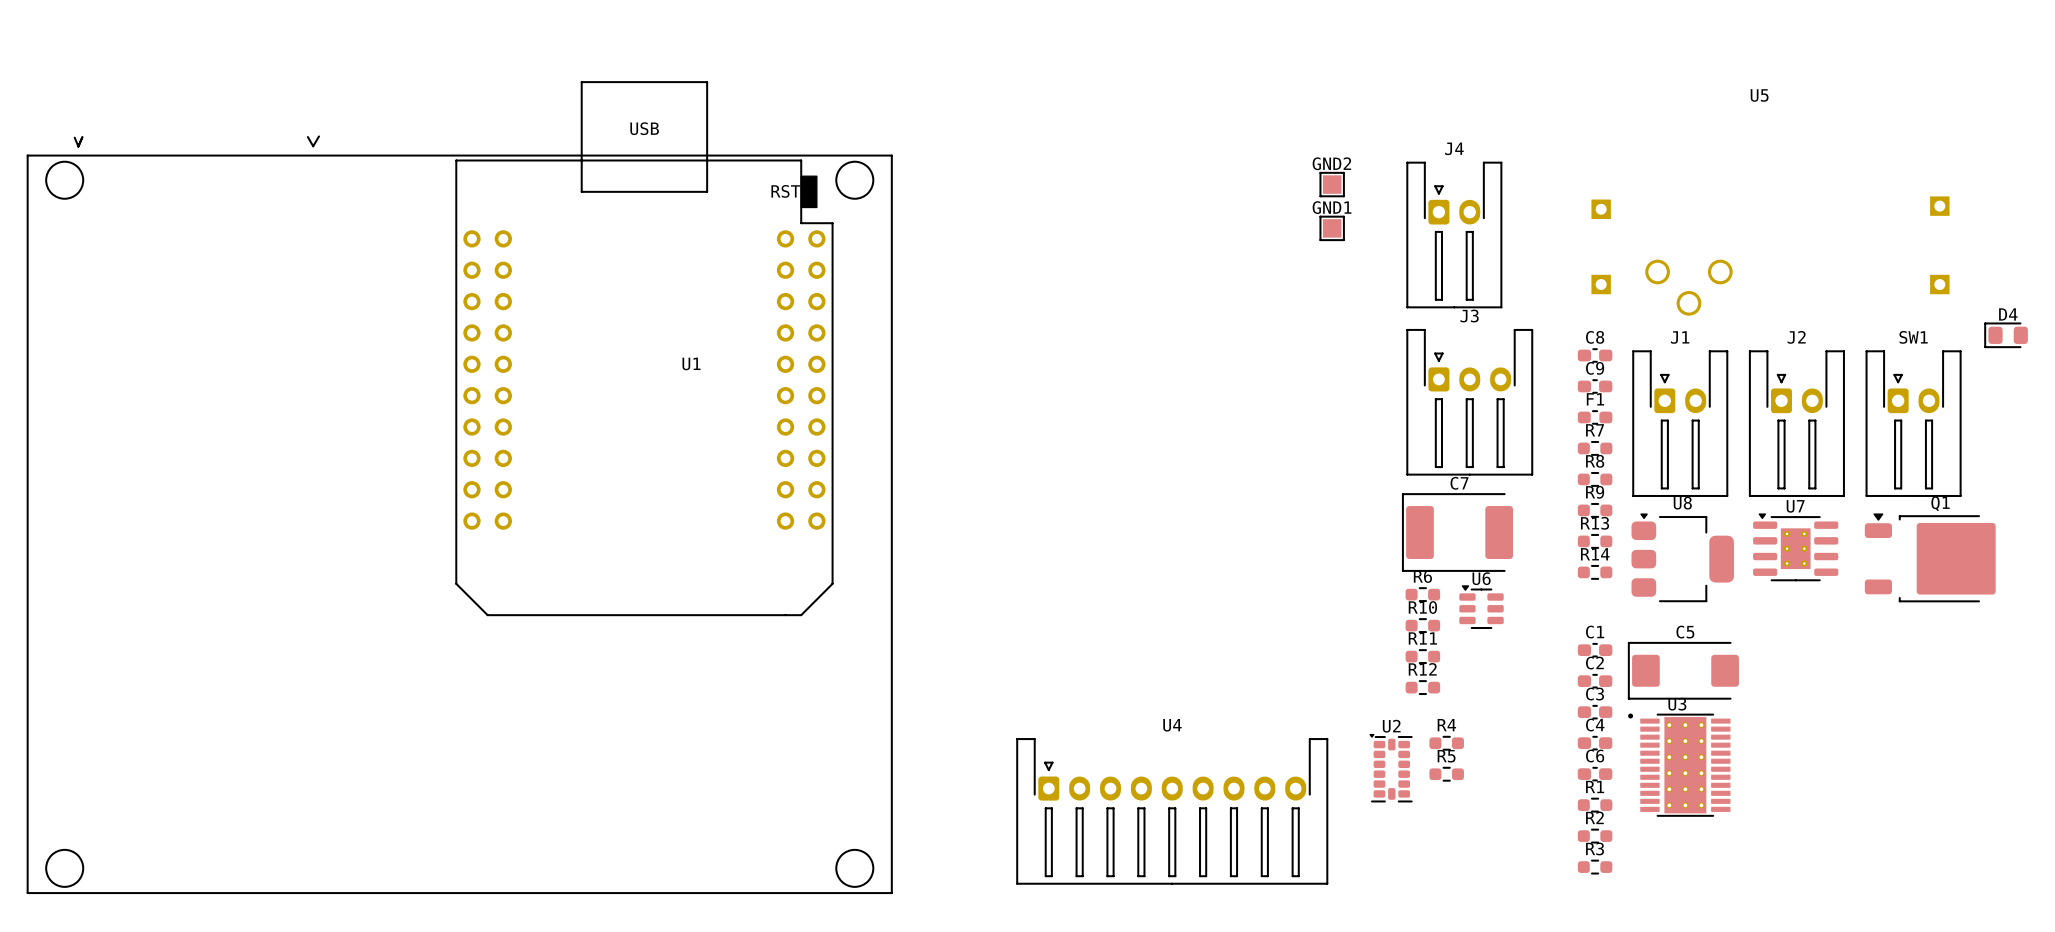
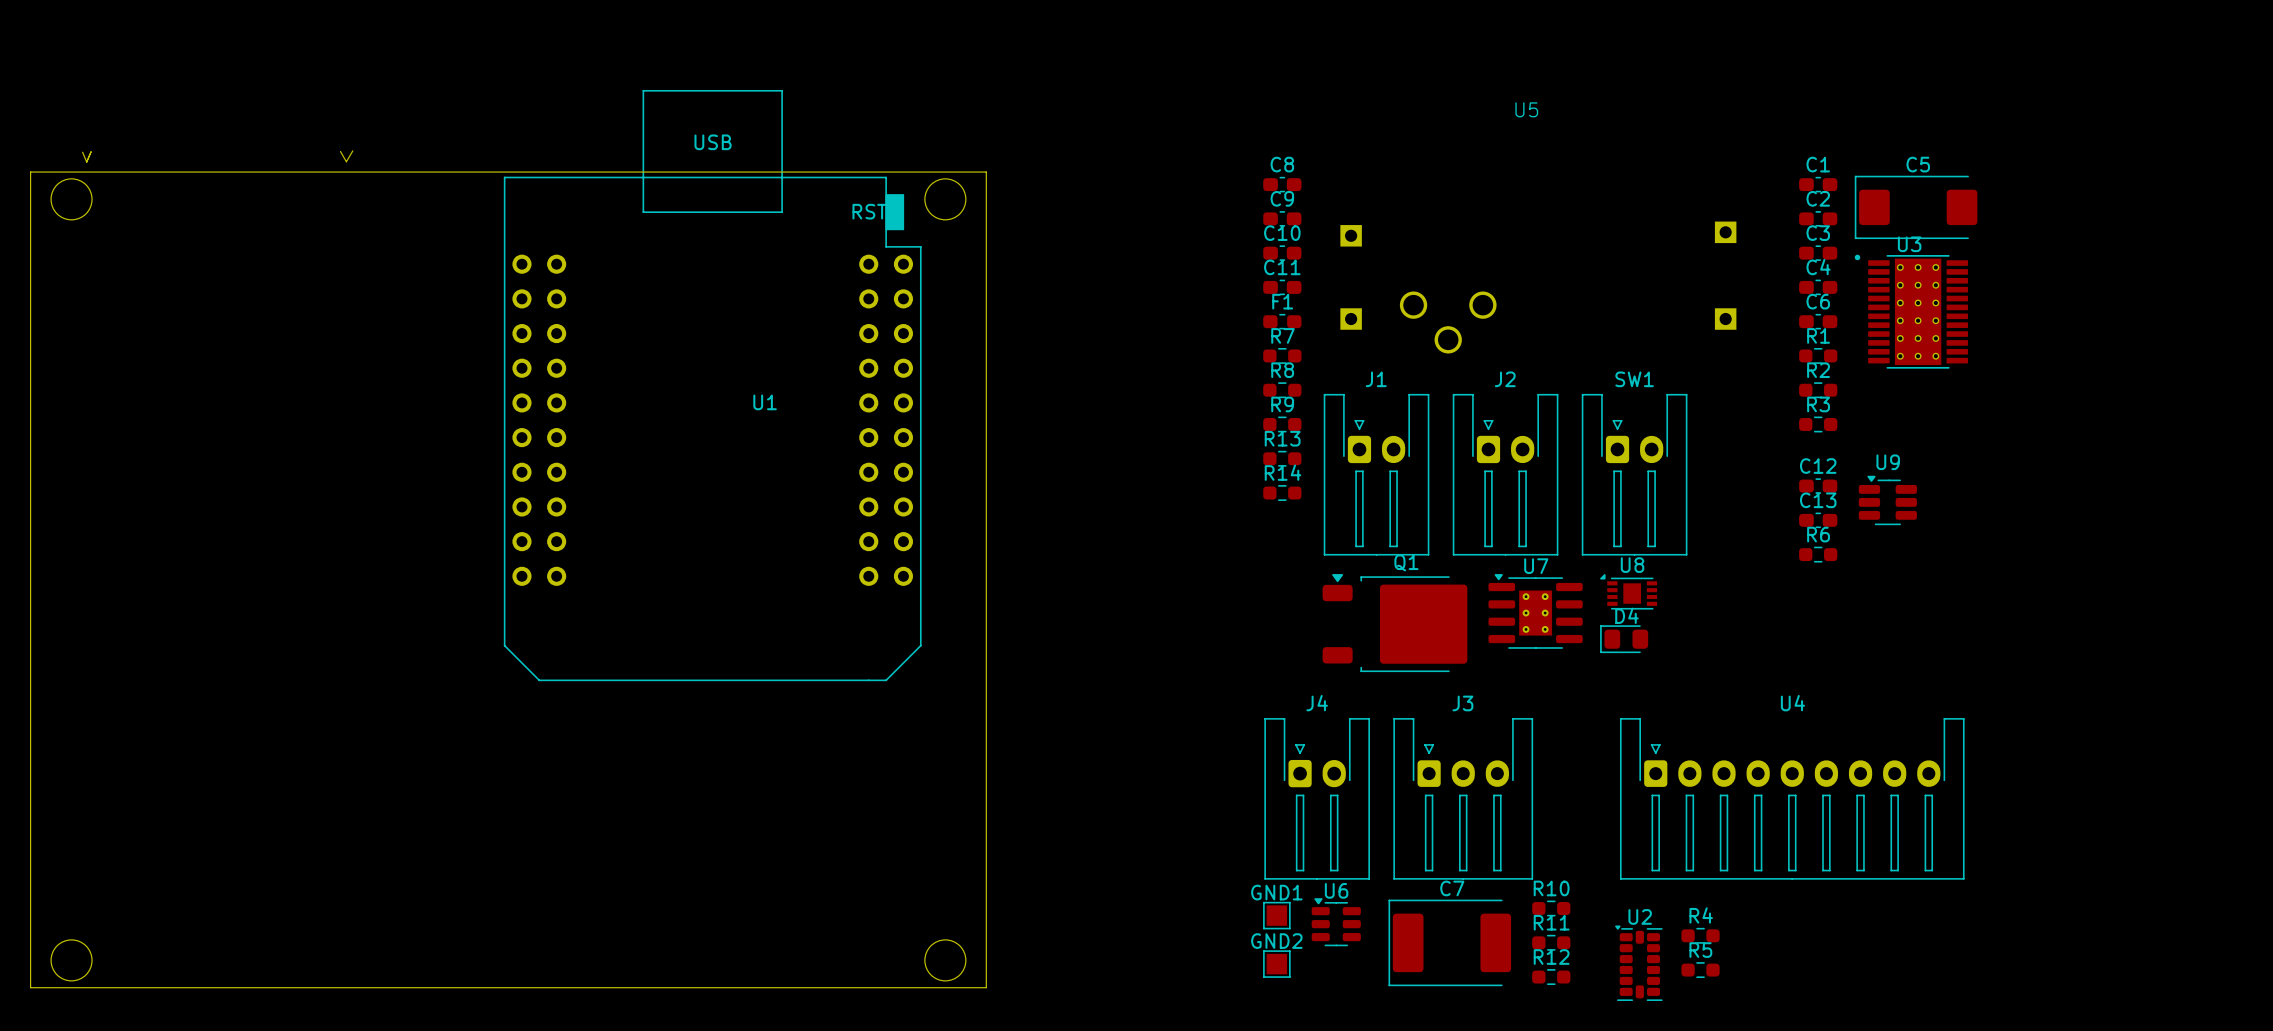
GND2 position: (1332, 184) -> (1276, 964)
C10: none -> (1282, 253)
GND1 position: (1332, 228) -> (1276, 915)
J4 position: (1454, 234) -> (1317, 798)
U5 position: (1770, 256) -> (1538, 287)
C11: none -> (1282, 287)
D4 position: (2006, 335) -> (1624, 639)
C8 position: (1595, 355) -> (1282, 184)
C9 position: (1595, 386) -> (1282, 218)
J3 position: (1469, 402) -> (1463, 798)
F1 position: (1595, 417) -> (1282, 321)
J1 position: (1680, 423) -> (1376, 474)
J2 position: (1796, 423) -> (1505, 474)
SW1 position: (1913, 423) -> (1634, 474)
C12: none -> (1818, 486)
R7 position: (1595, 448) -> (1282, 355)
U9: none -> (1887, 500)
C13: none -> (1818, 520)
R8 position: (1595, 479) -> (1282, 390)
U8 name position: U8 (1682, 503) -> U8 (1632, 565)
R9 position: (1595, 510) -> (1282, 424)
U8 footprint: [1631, 513, 1734, 602] -> [1600, 574, 1658, 610]
C7 position: (1457, 532) -> (1449, 942)
R13 position: (1595, 541) -> (1282, 458)
U7 position: (1795, 547) -> (1535, 611)
Q1 position: (1930, 557) -> (1394, 623)
R14 position: (1595, 572) -> (1282, 493)
R6 position: (1422, 594) -> (1818, 554)
U6 position: (1481, 607) -> (1336, 922)
R10 position: (1422, 625) -> (1551, 908)
C1 position: (1595, 650) -> (1818, 184)
R11 position: (1422, 656) -> (1551, 942)
C5 position: (1683, 670) -> (1916, 207)
C2 position: (1595, 681) -> (1818, 218)
R12 position: (1422, 687) -> (1551, 977)
C3 position: (1595, 712) -> (1818, 253)
R4 position: (1446, 743) -> (1700, 935)
C4 position: (1595, 743) -> (1818, 287)
U3 position: (1679, 765) -> (1911, 311)
U2 position: (1390, 768) -> (1638, 963)
R5 position: (1446, 774) -> (1700, 970)
C6 position: (1595, 774) -> (1818, 321)
R1 position: (1595, 805) -> (1818, 355)
U4 position: (1172, 811) -> (1792, 798)
R2 position: (1595, 836) -> (1818, 390)
R3 position: (1595, 867) -> (1818, 424)

